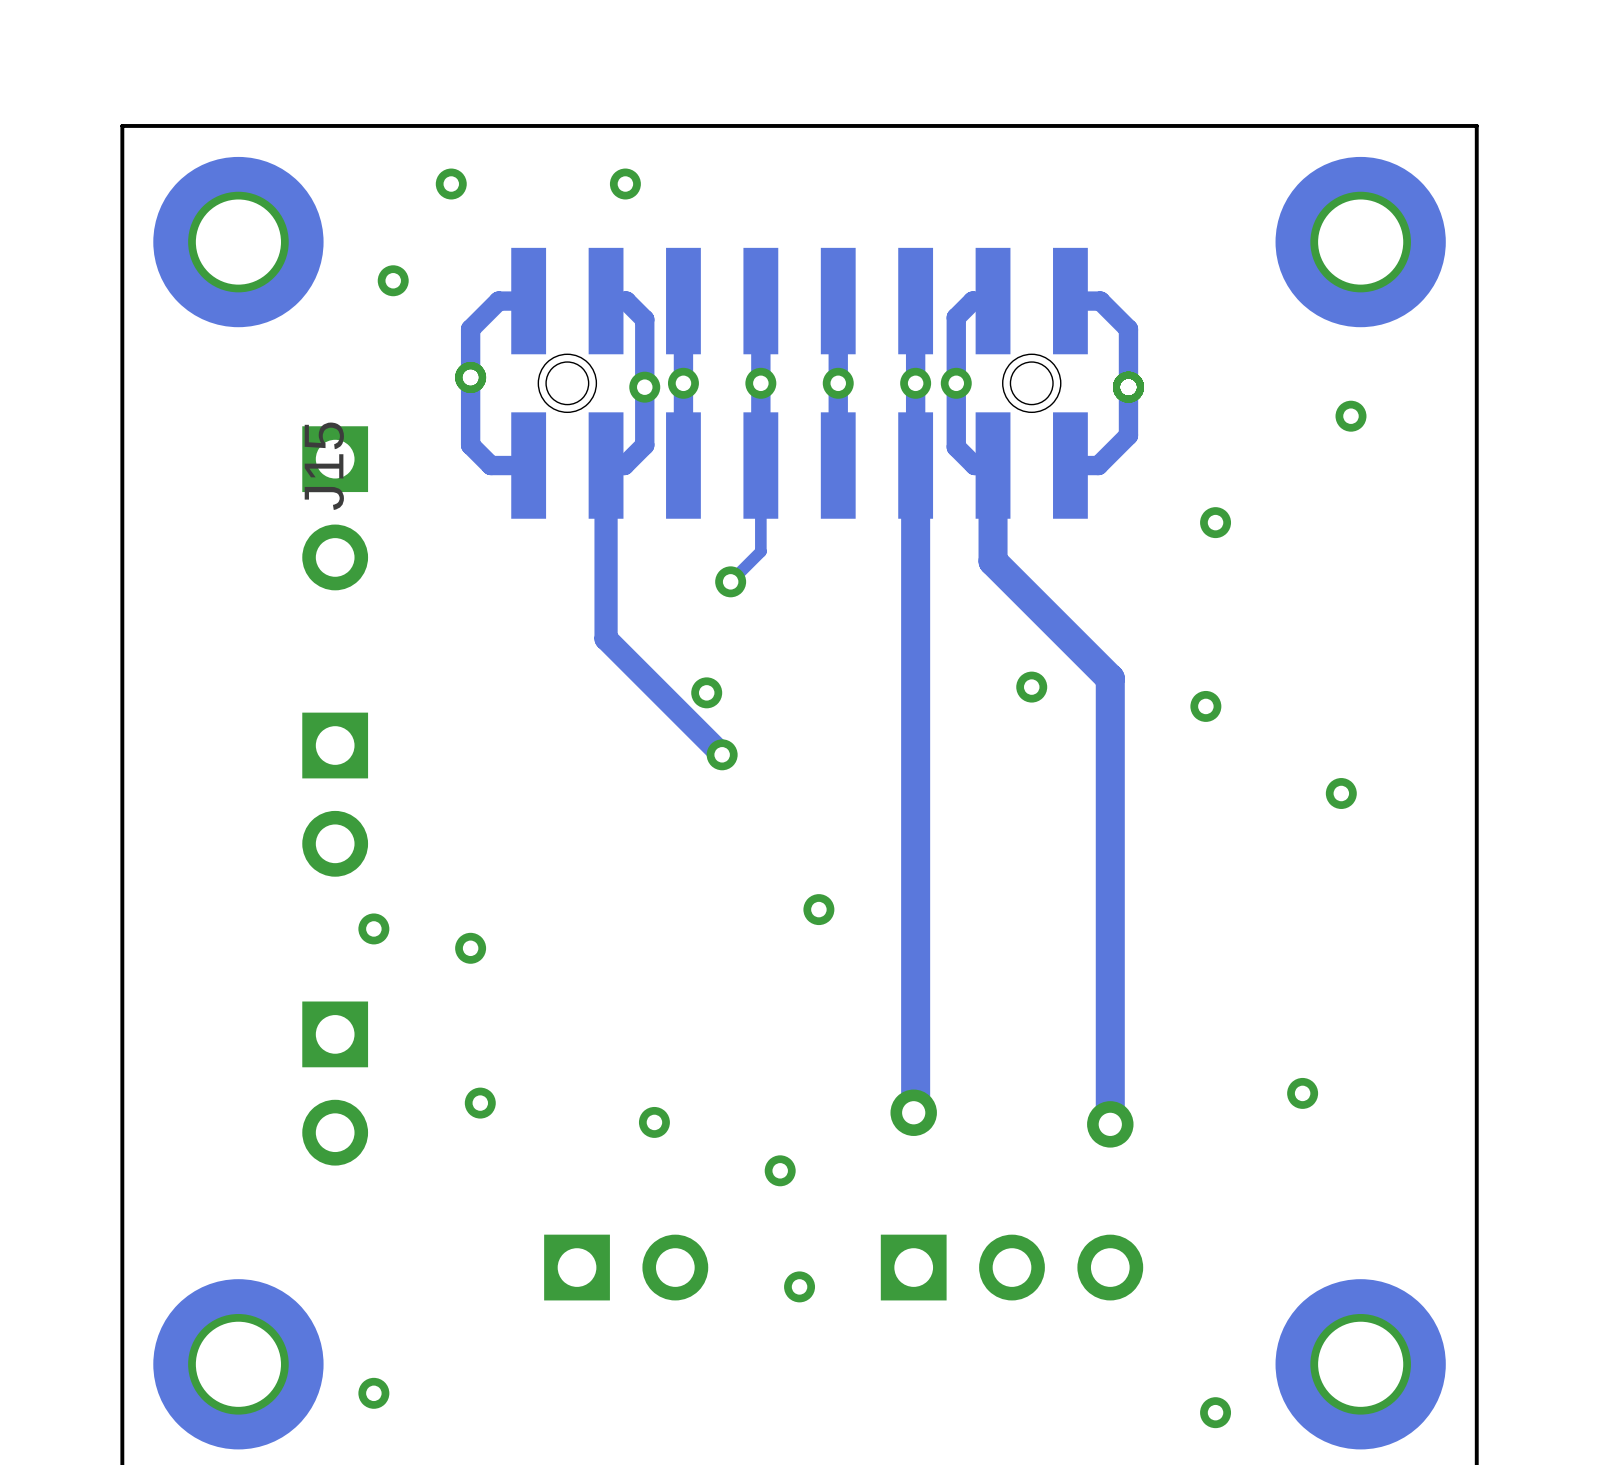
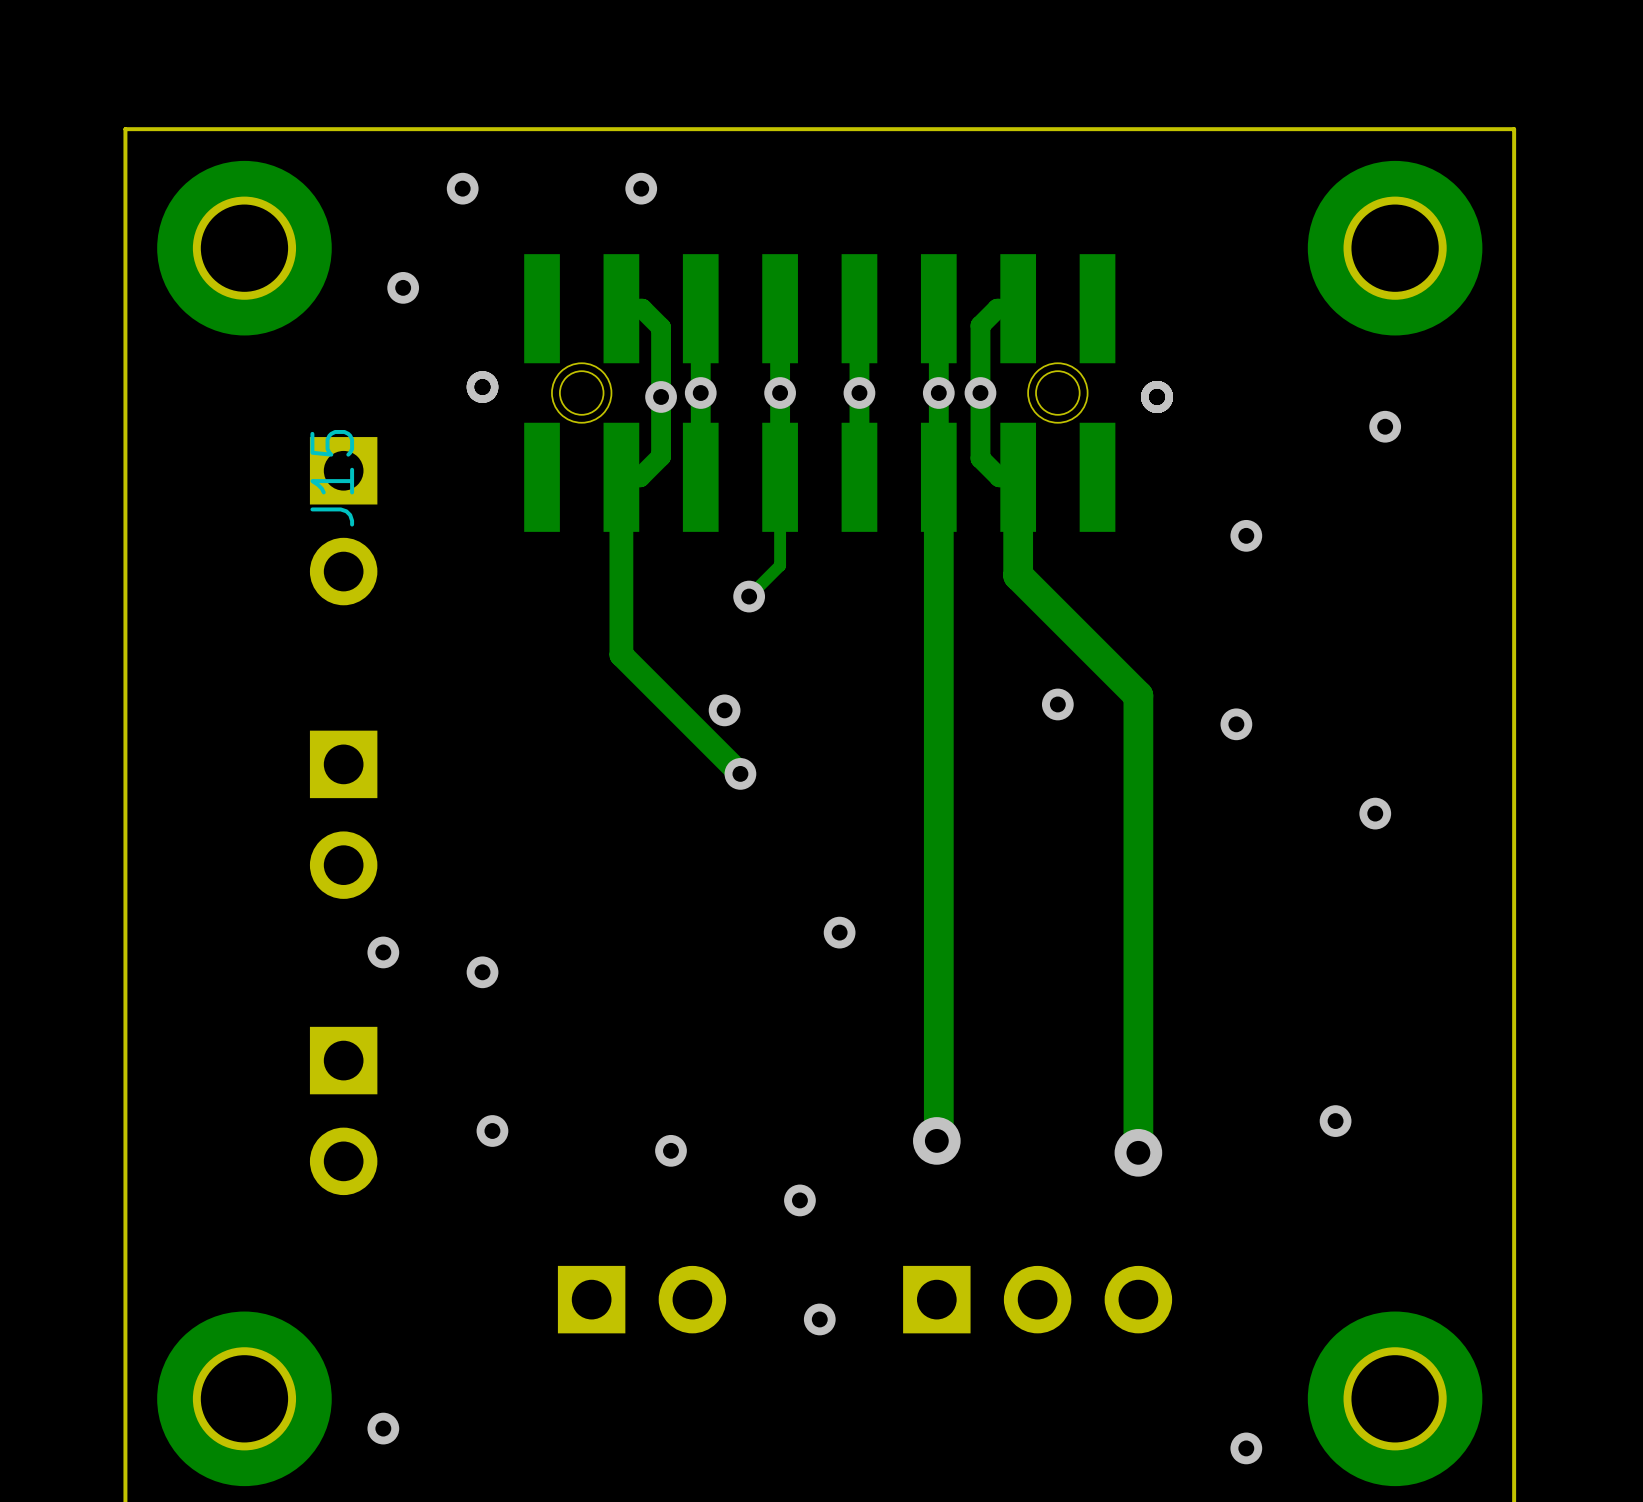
track: (528, 301) (498, 301) (470, 329) (470, 445) (490, 465) (528, 465) -> none
track: (1070, 301) (1100, 301) (1128, 329) (1128, 435) (1098, 465) (1070, 465) -> none

